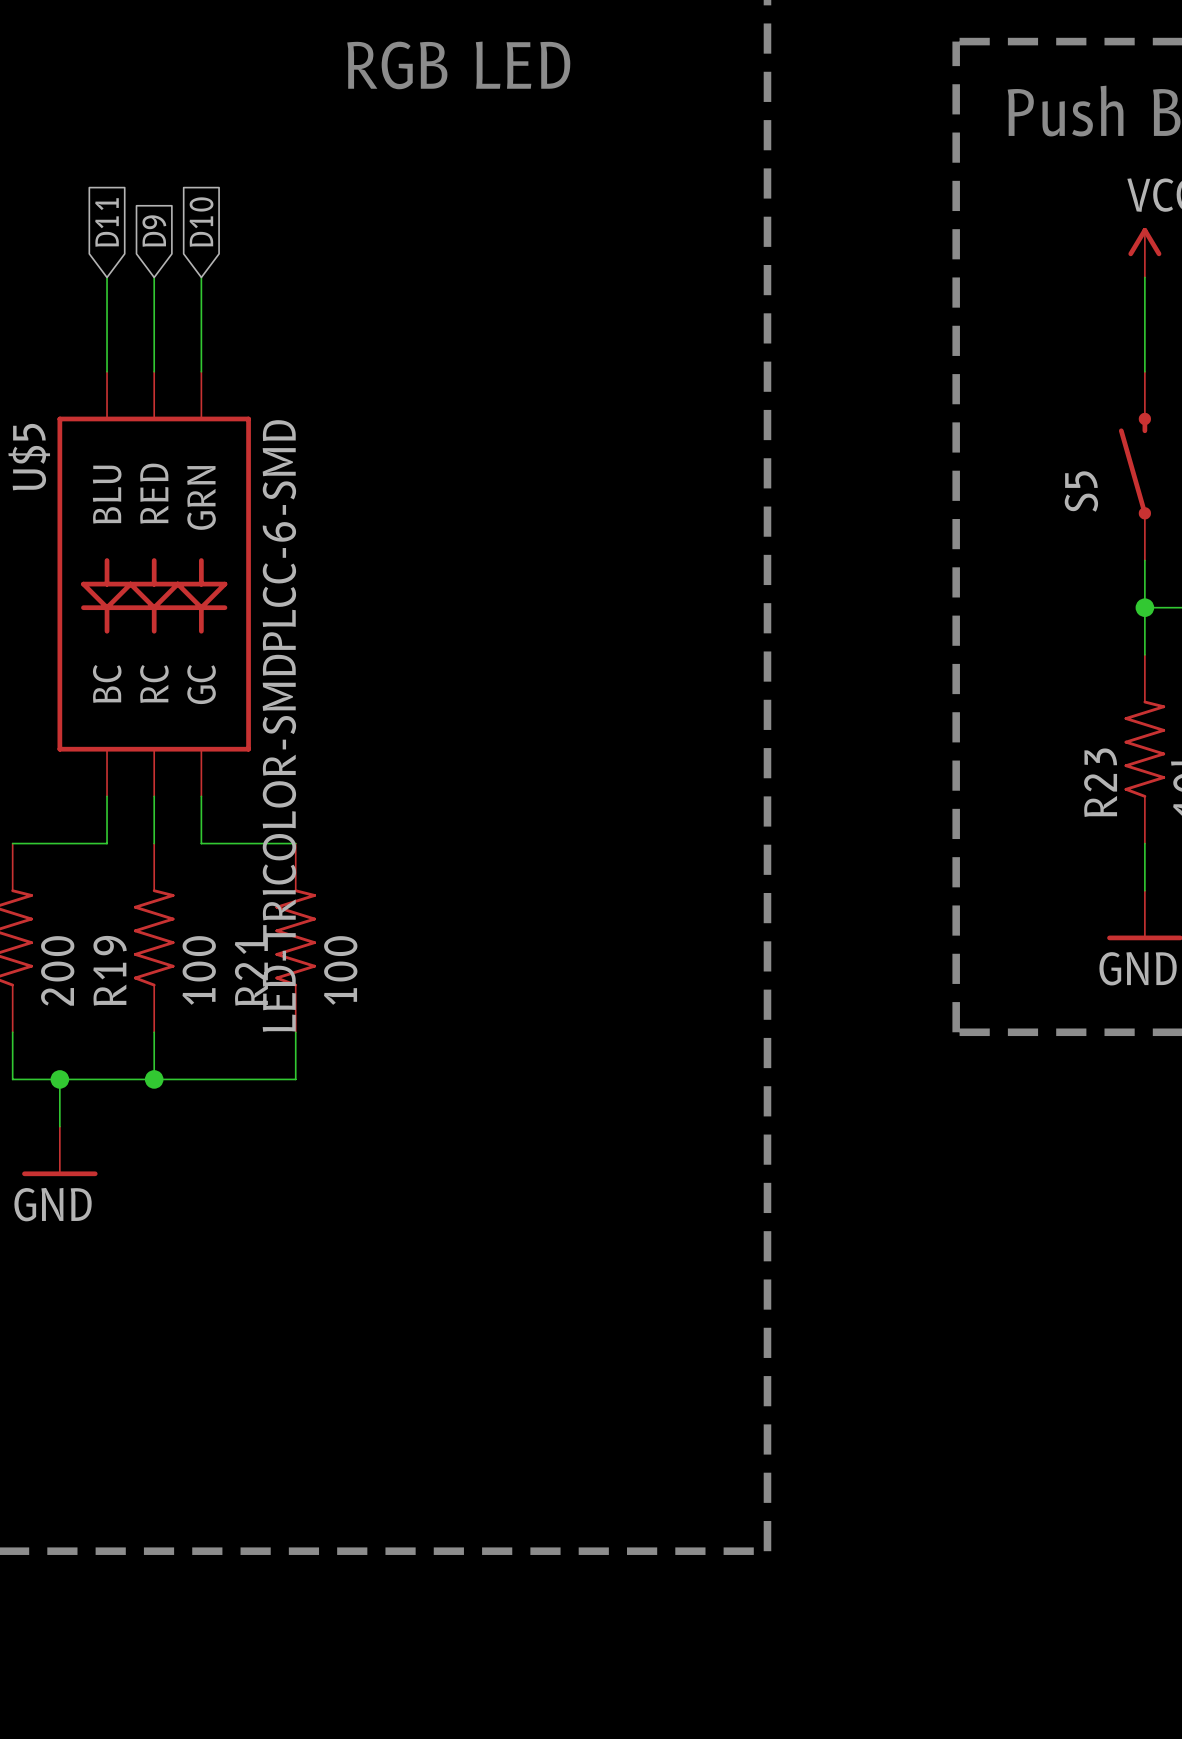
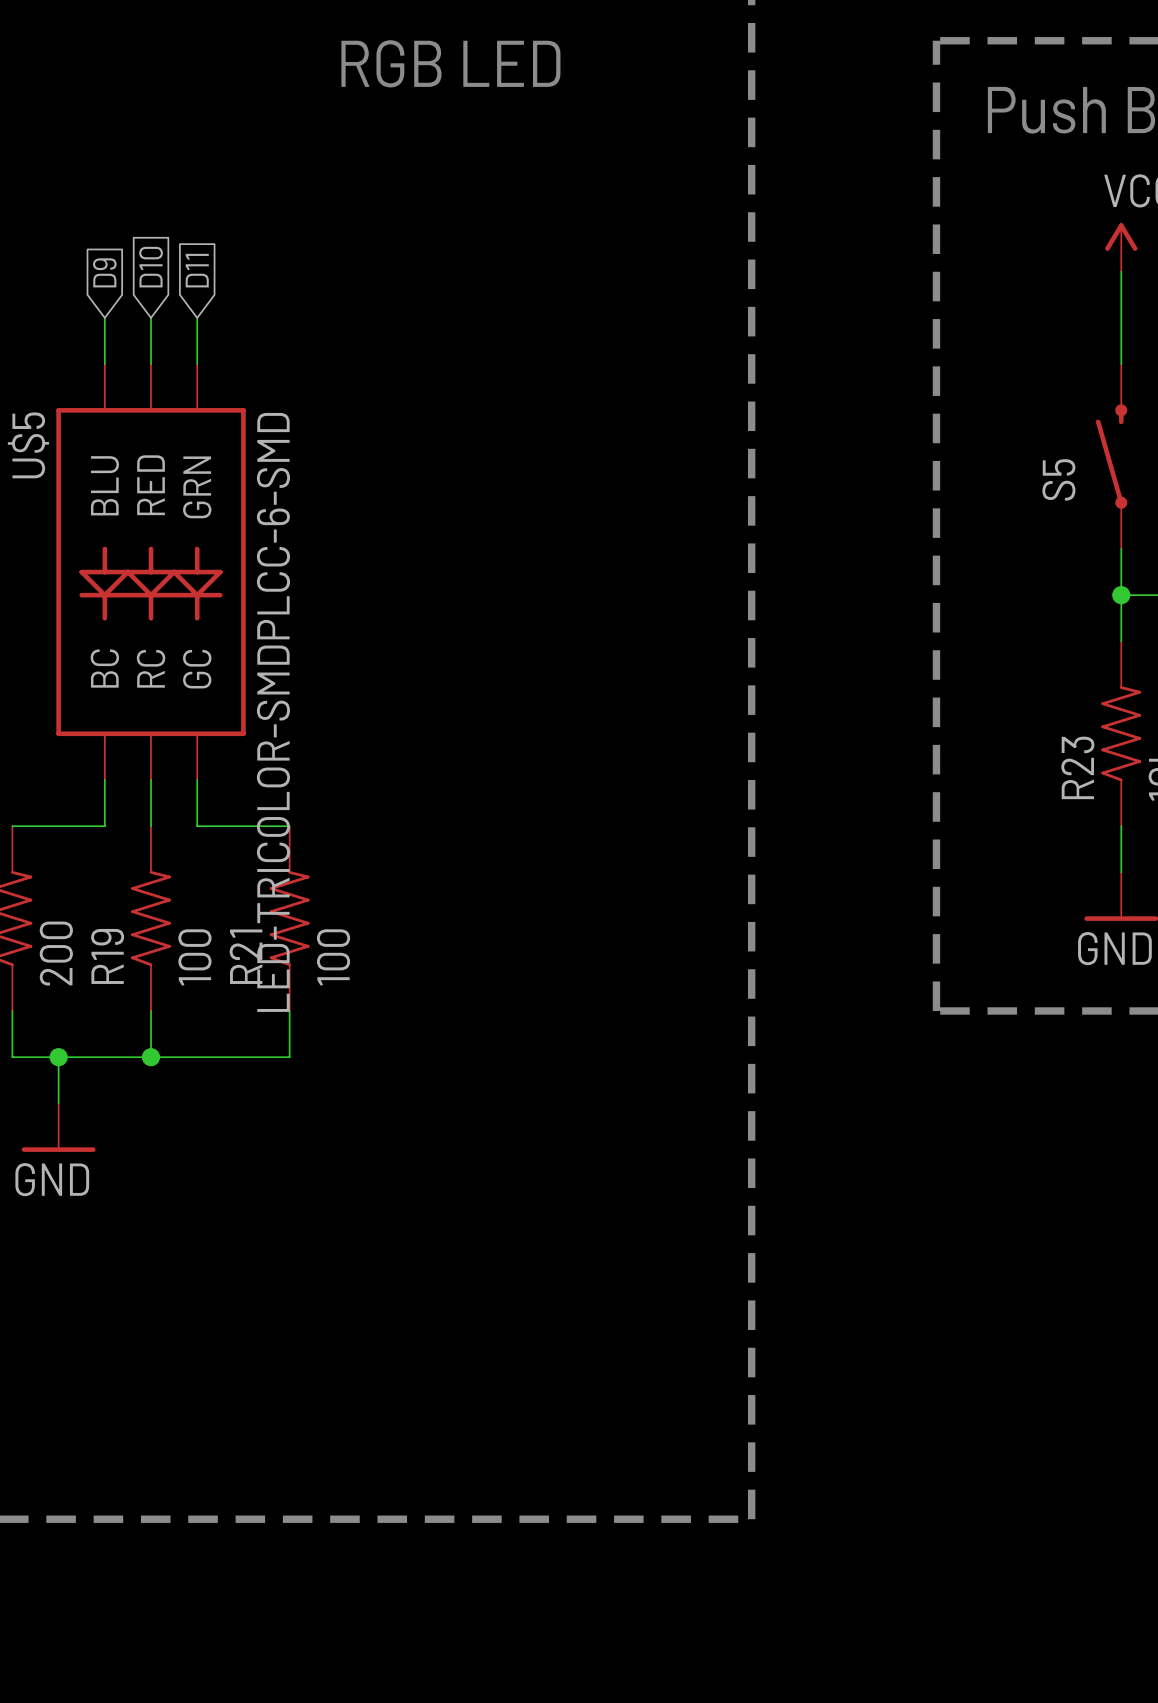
global label position: D11 (107, 222) -> D11 (197, 270)
global label position: D10 (201, 222) -> D10 (151, 267)
global label position: D9 (154, 231) -> D9 (104, 272)
wire: (107, 277) (107, 324) -> none
wire: (154, 277) (154, 324) -> none
wire: (201, 277) (201, 324) -> none

